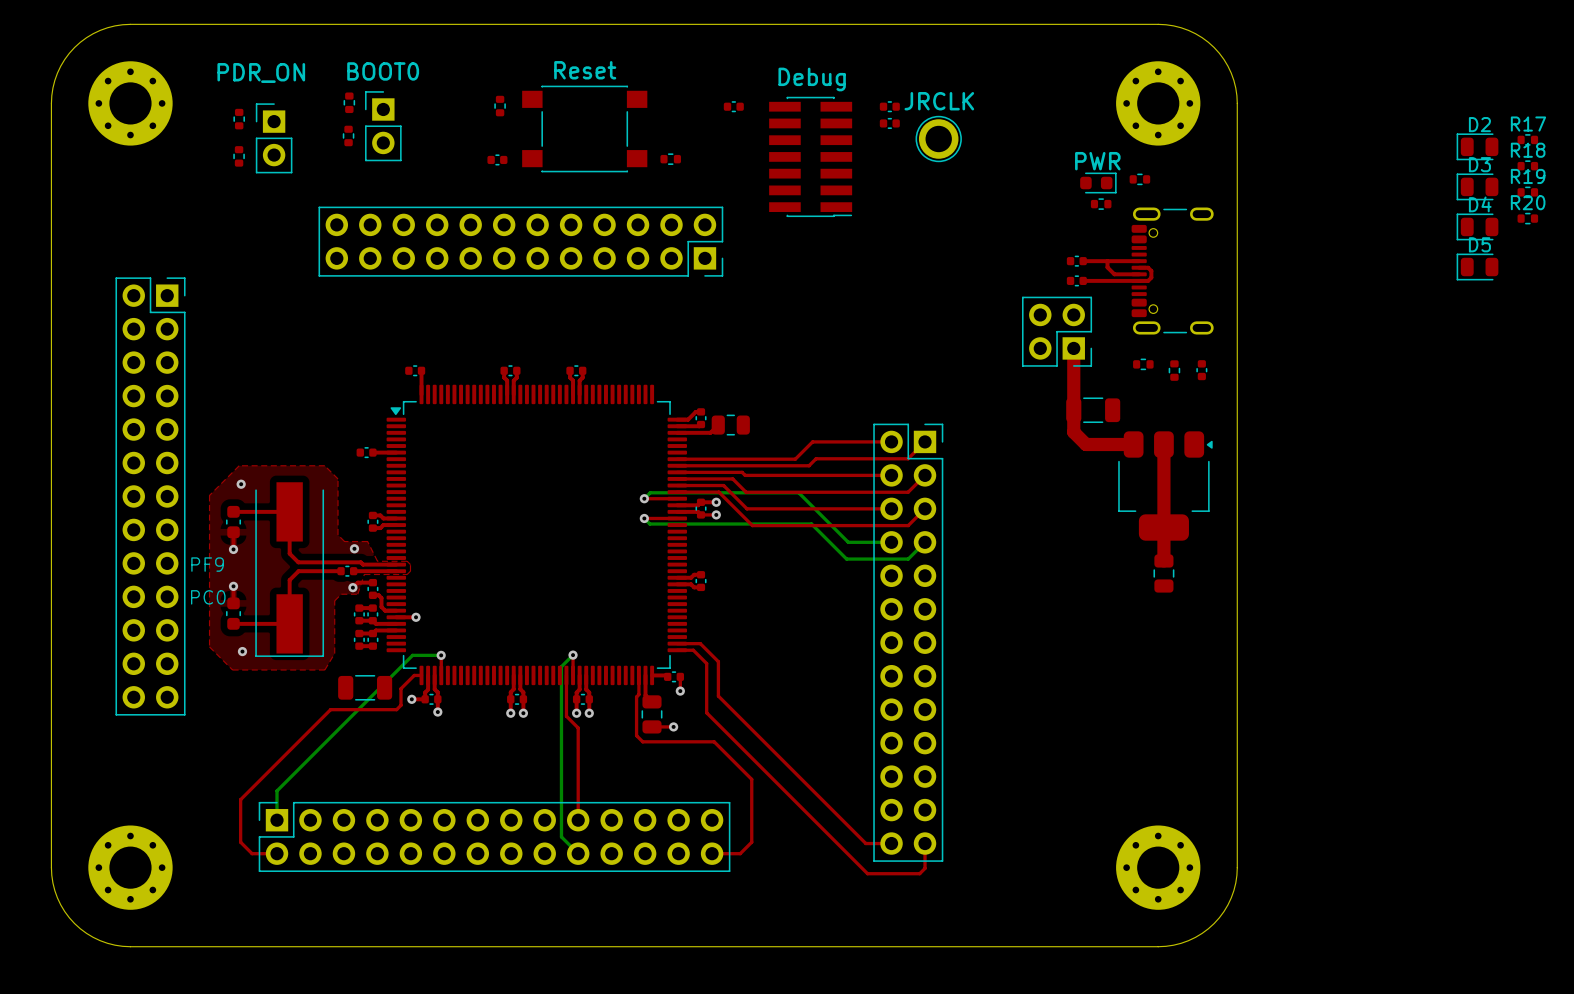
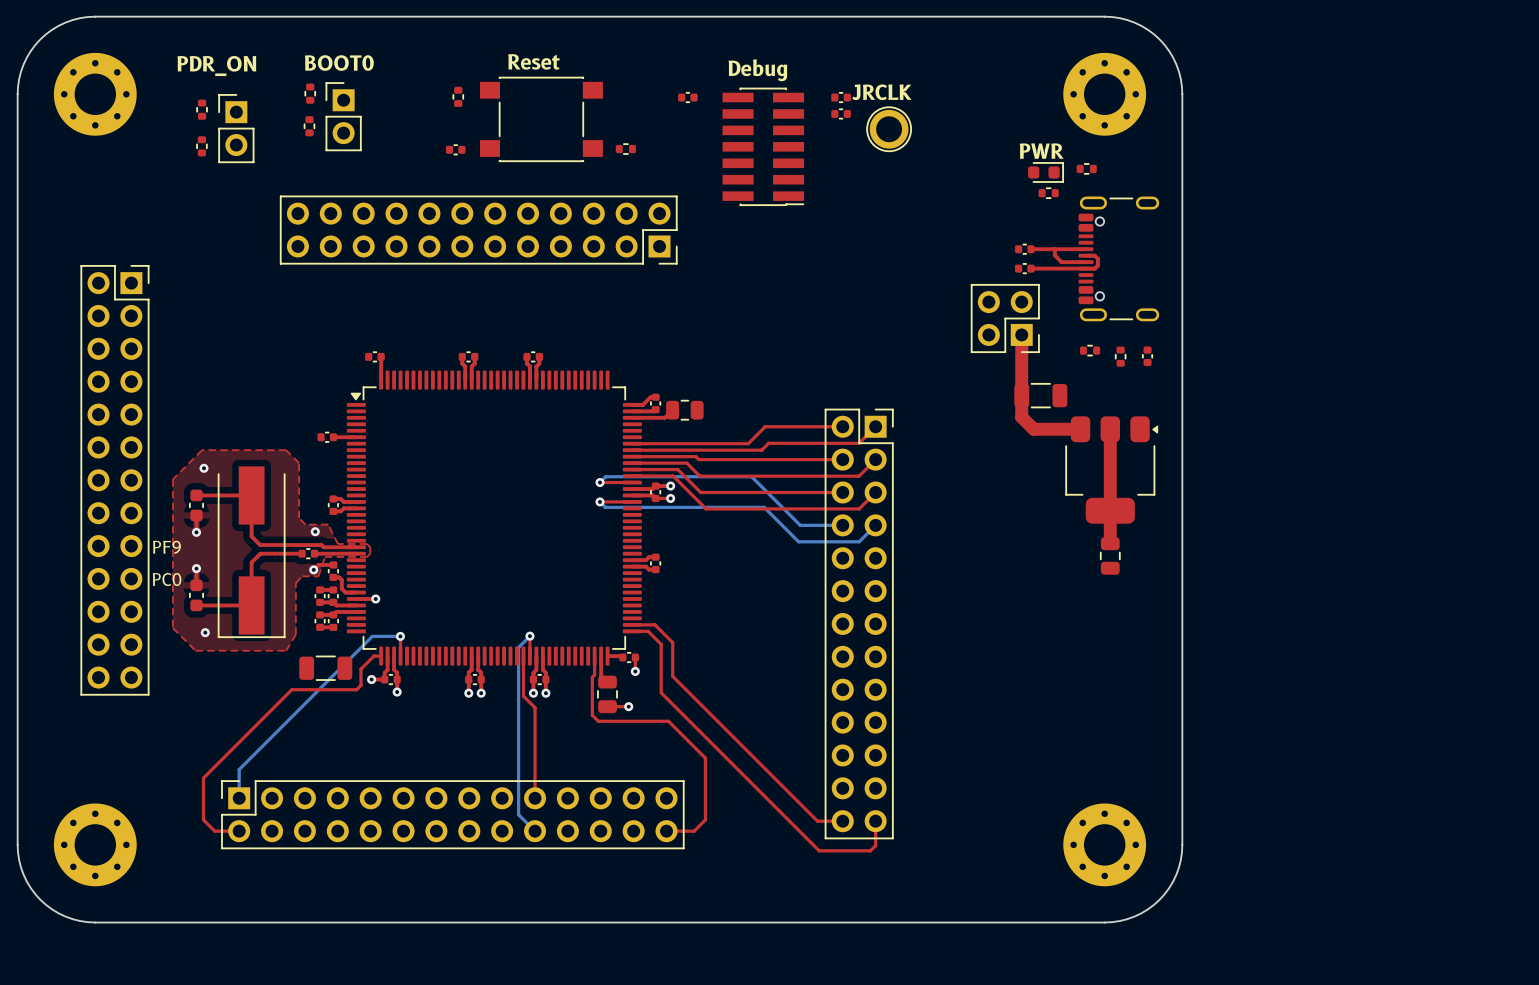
R17: (1527, 139) -> none
D2: (1477, 146) -> none
R18: (1527, 166) -> none
D3: (1477, 186) -> none
R19: (1527, 192) -> none
R20: (1527, 218) -> none
D4: (1477, 226) -> none
D5: (1477, 267) -> none

